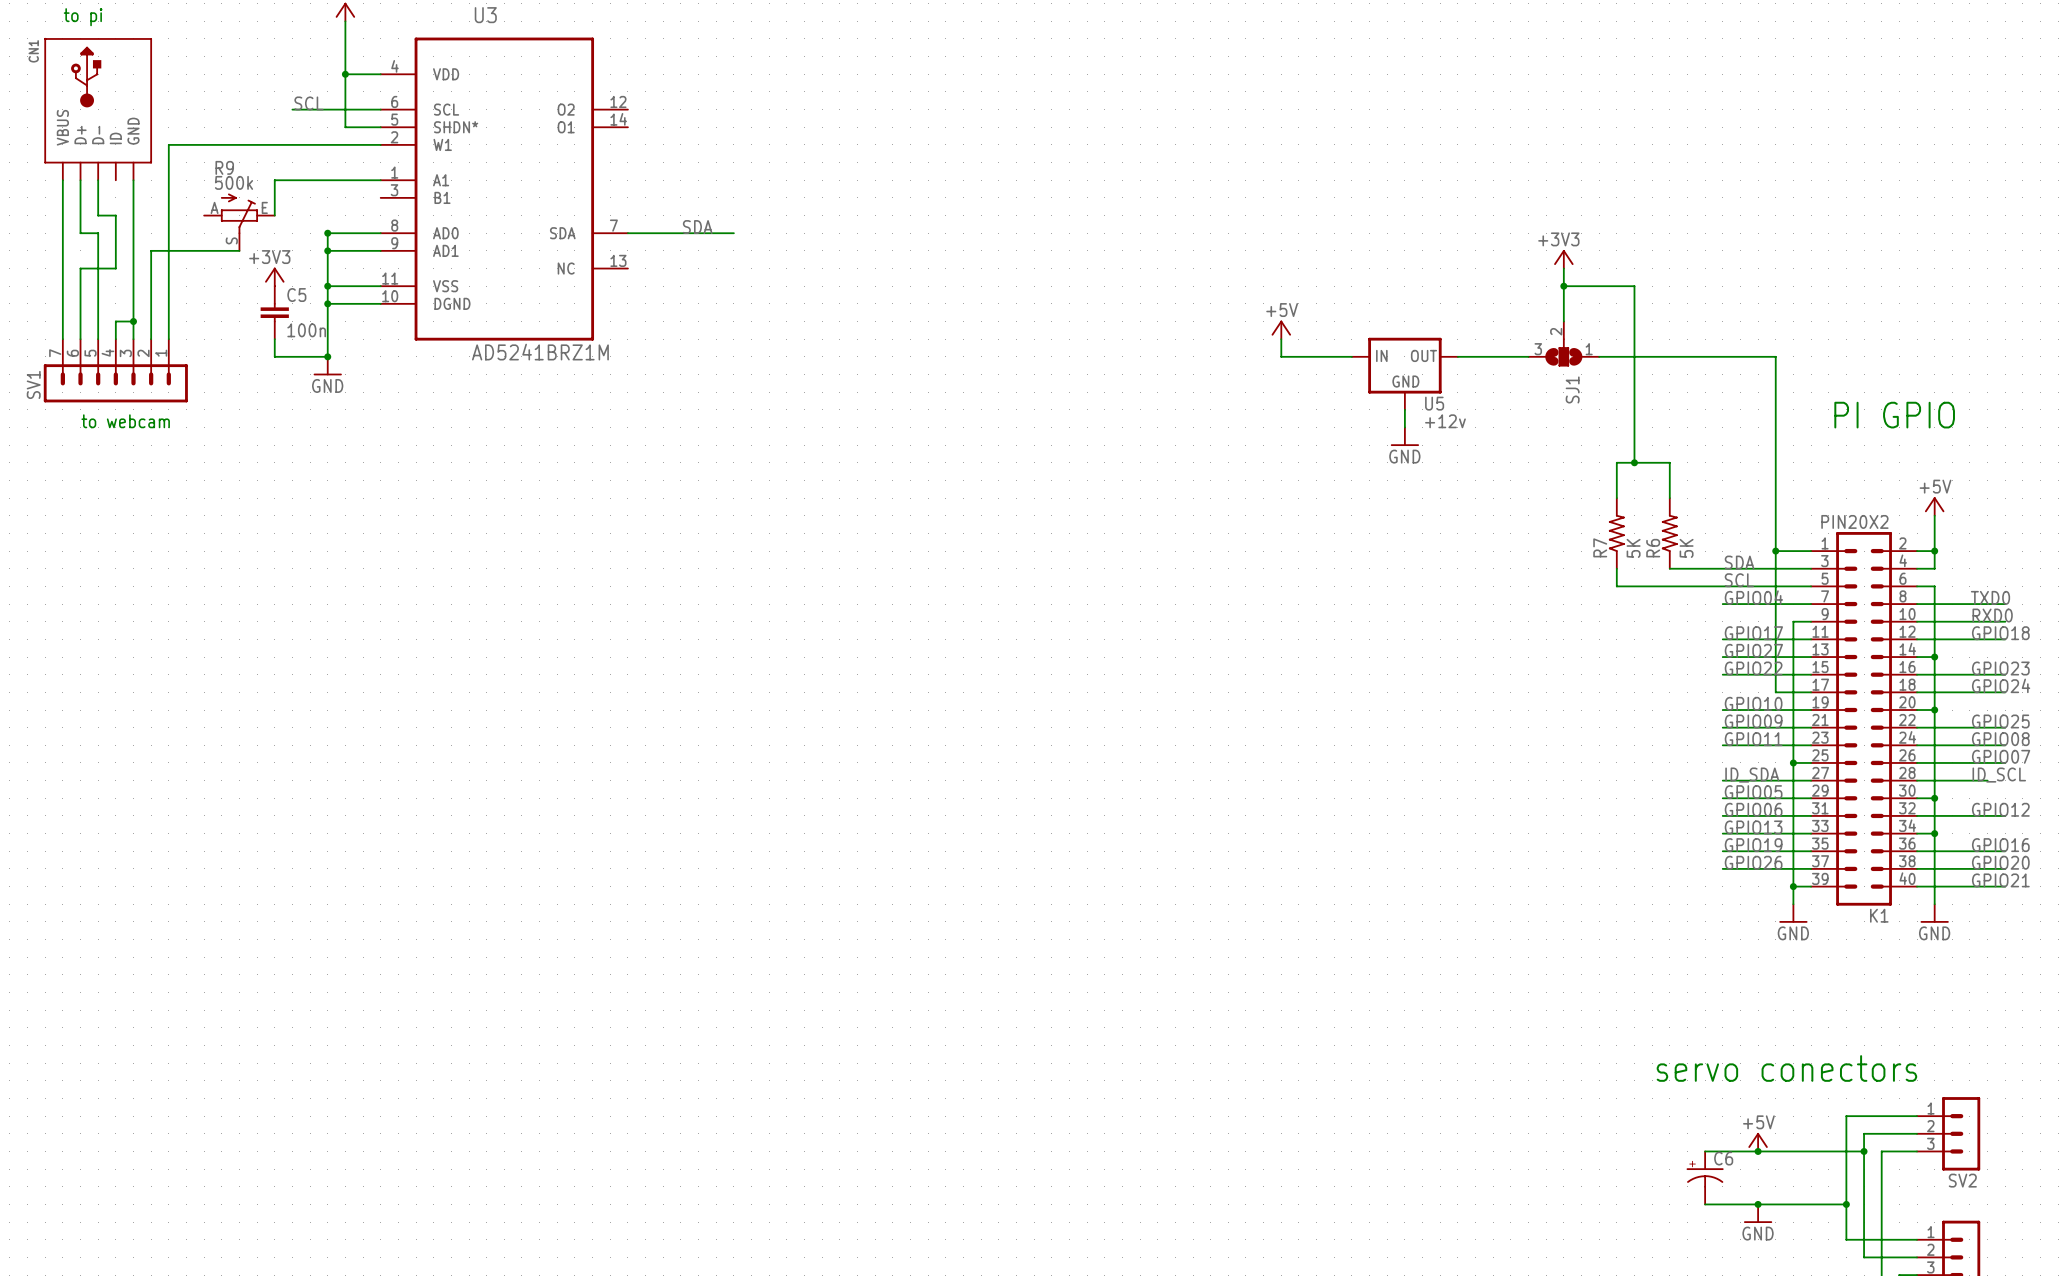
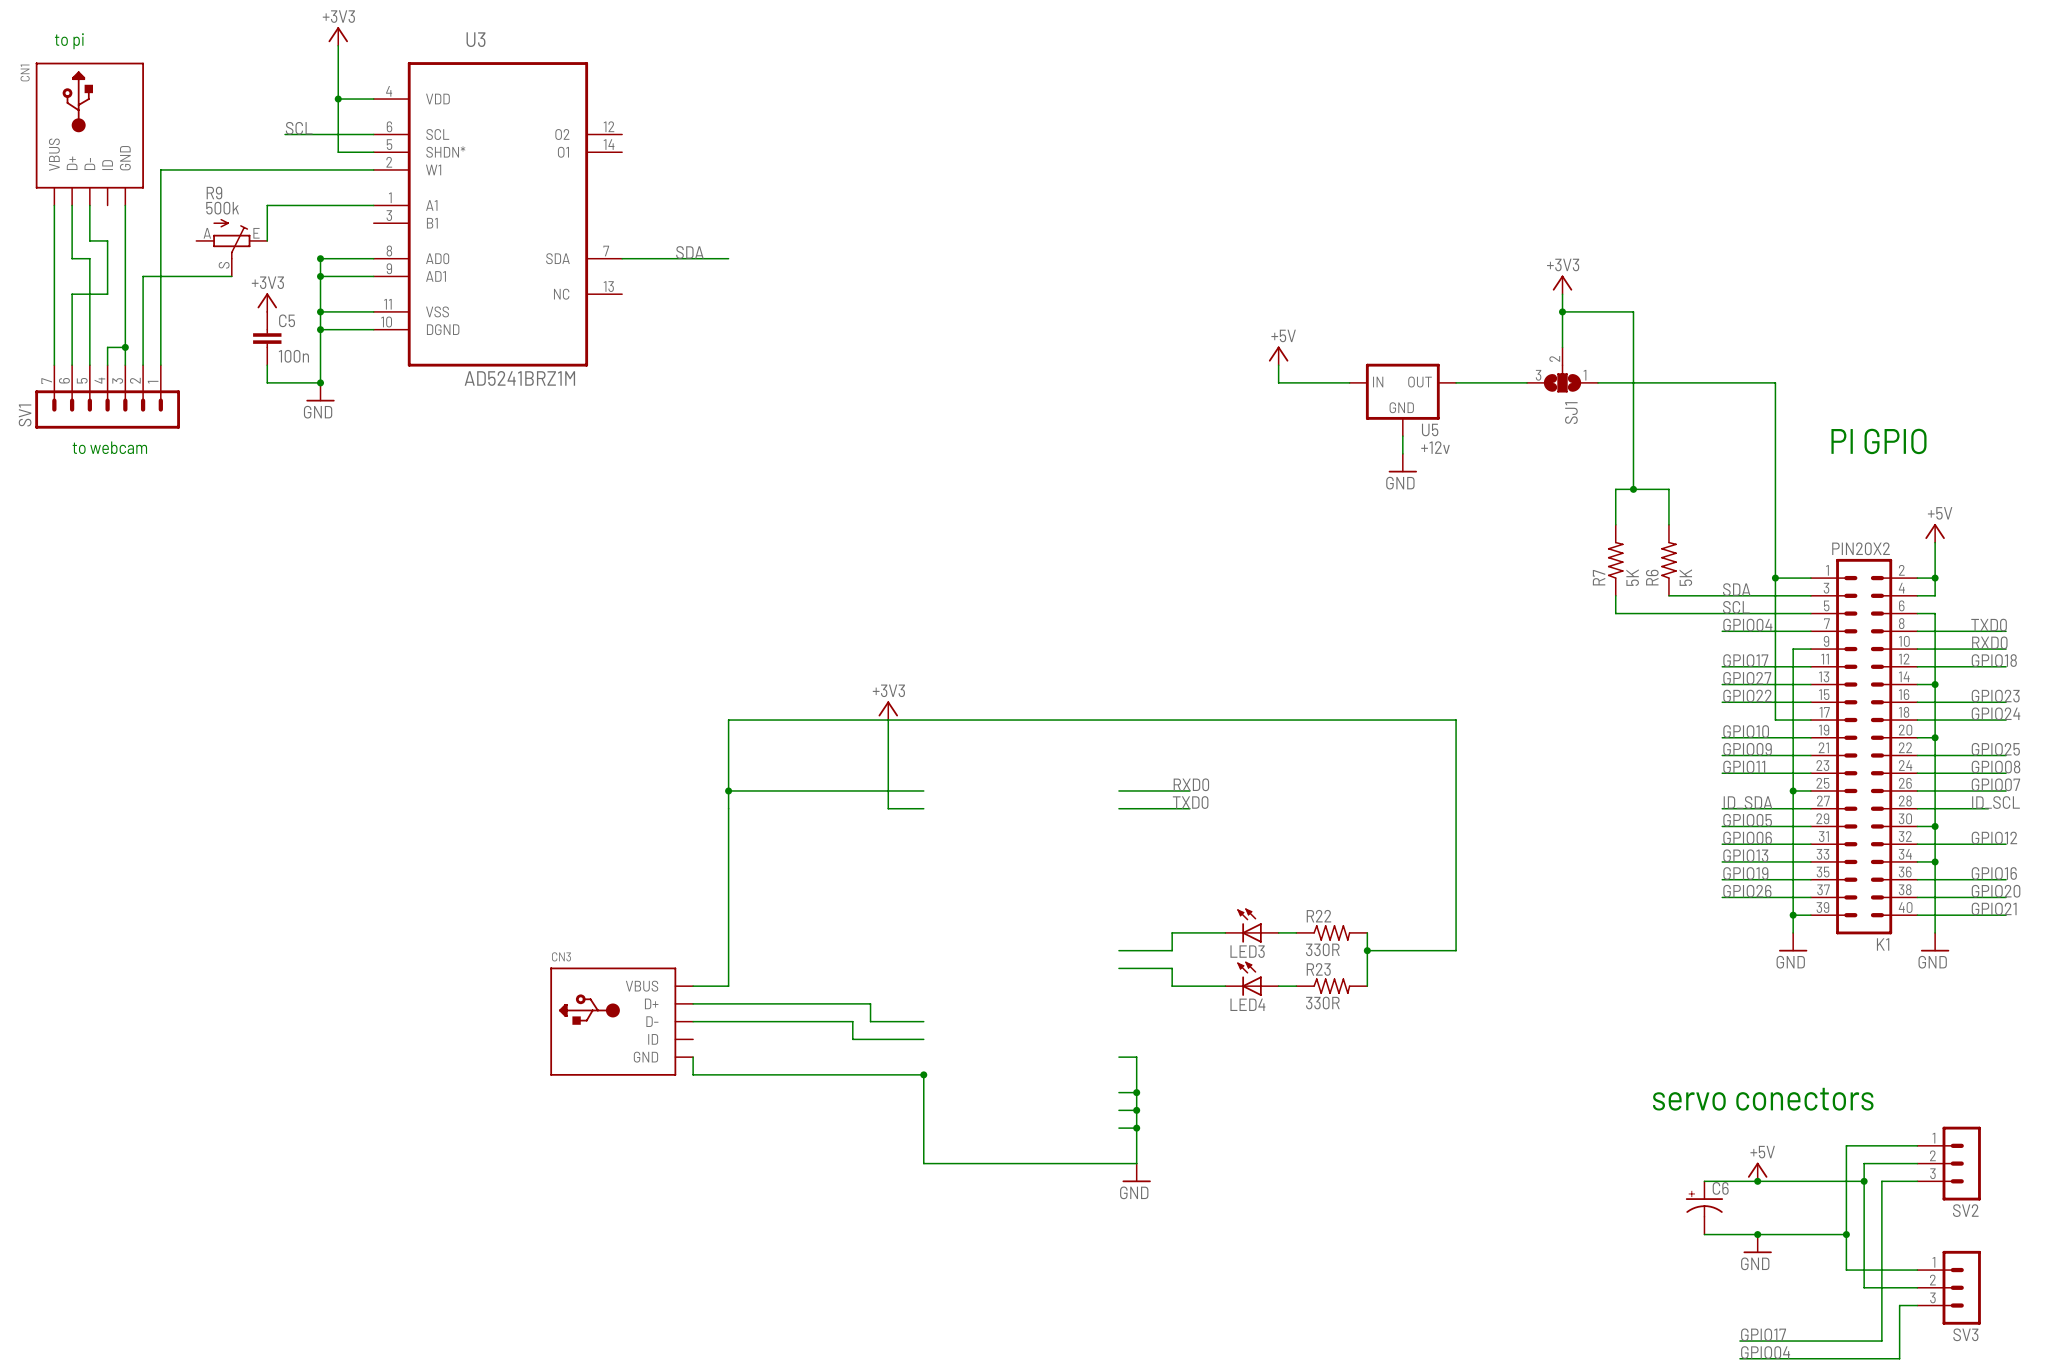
power symbol: none -> +3V3 (888, 710)
wire: none -> (888, 720) (888, 808) (923, 808)
label: none -> RXD0 (1191, 784)
wire: none -> (728, 790) (923, 790)
junction: none -> (728, 790)
wire: none -> (1118, 790) (1189, 790)
label: none -> TXD0 (1190, 802)
wire: none -> (1118, 808) (1189, 808)
LED3: none -> (1252, 925)
wire: none -> (1225, 932) (1172, 932) (1172, 950) (1118, 950)
wire: none -> (1278, 932) (1296, 932)
R22: none -> 330R (1331, 932)
wire: none -> (1367, 932) (1367, 986)
wire: none -> (1367, 950) (1456, 950) (1456, 720) (728, 720) (728, 986) (693, 986)
junction: none -> (1367, 950)
wire: none -> (1118, 968) (1172, 968) (1172, 986) (1225, 986)
LED4: none -> (1252, 978)
wire: none -> (1278, 986) (1296, 986)
R23: none -> 330R (1331, 986)
wire: none -> (693, 1003) (870, 1003) (870, 1021) (923, 1021)
CN3: none -> (621, 1021)
wire: none -> (693, 1021) (852, 1021) (852, 1039) (923, 1039)
wire: none -> (693, 1057) (693, 1074) (923, 1074) (923, 1163) (1136, 1163) (1136, 1057) (1118, 1057)
junction: none -> (923, 1074)
wire: none -> (1118, 1092) (1136, 1092)
junction: none -> (1136, 1092)
wire: none -> (1118, 1110) (1136, 1110)
junction: none -> (1136, 1110)
wire: none -> (1118, 1128) (1136, 1128)
junction: none -> (1136, 1128)
power symbol: none -> GND (1136, 1172)

